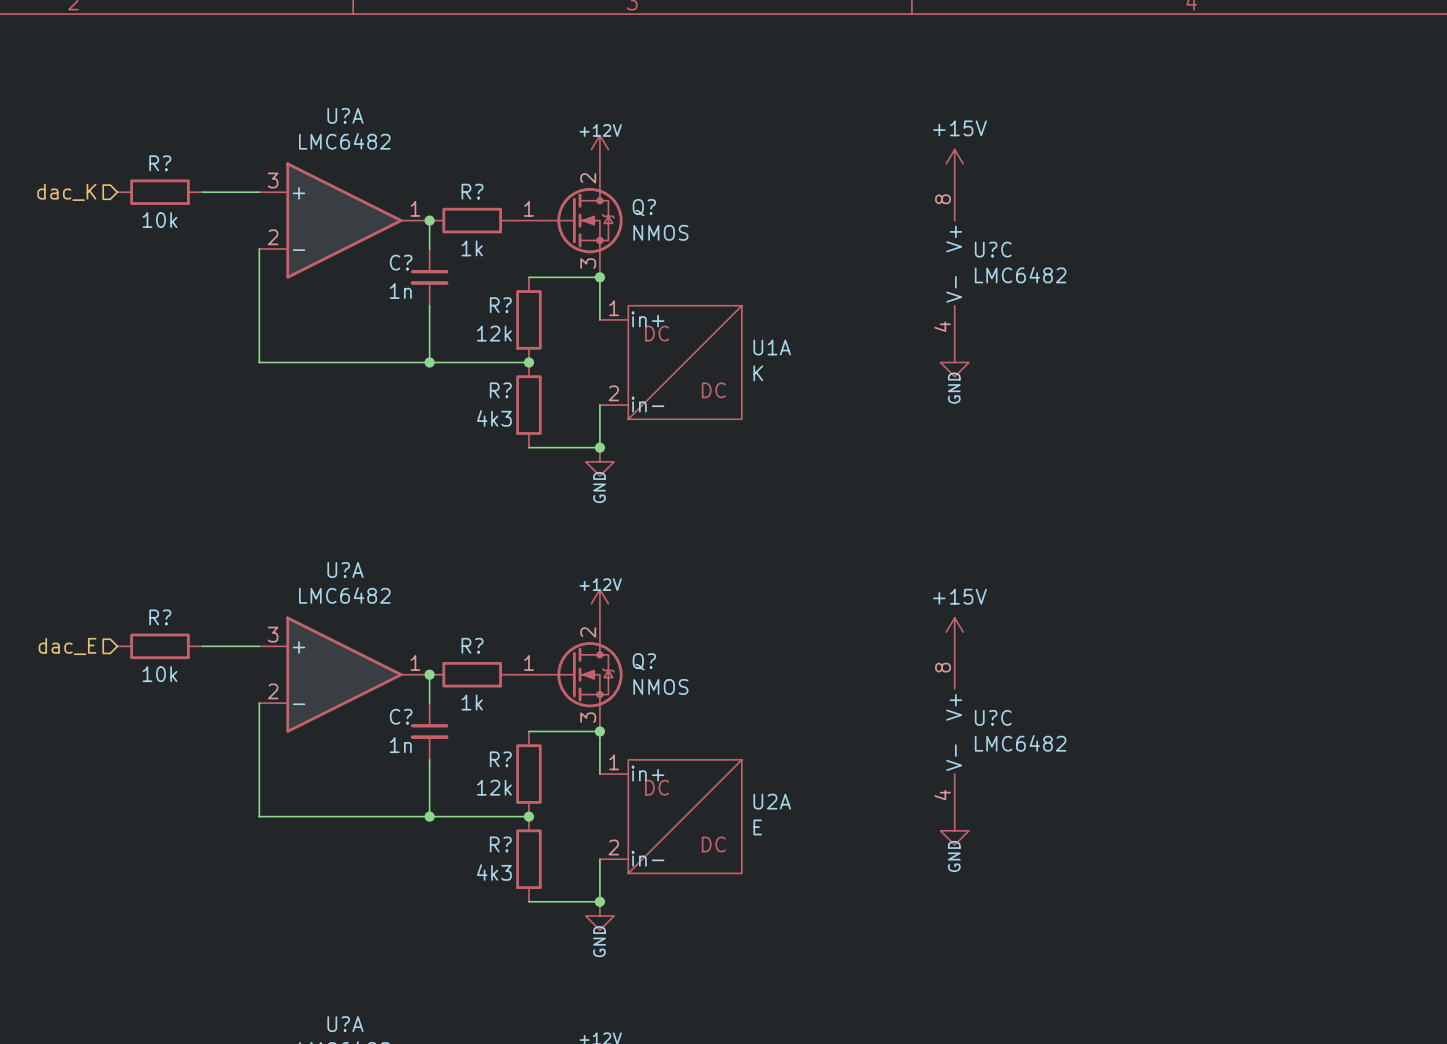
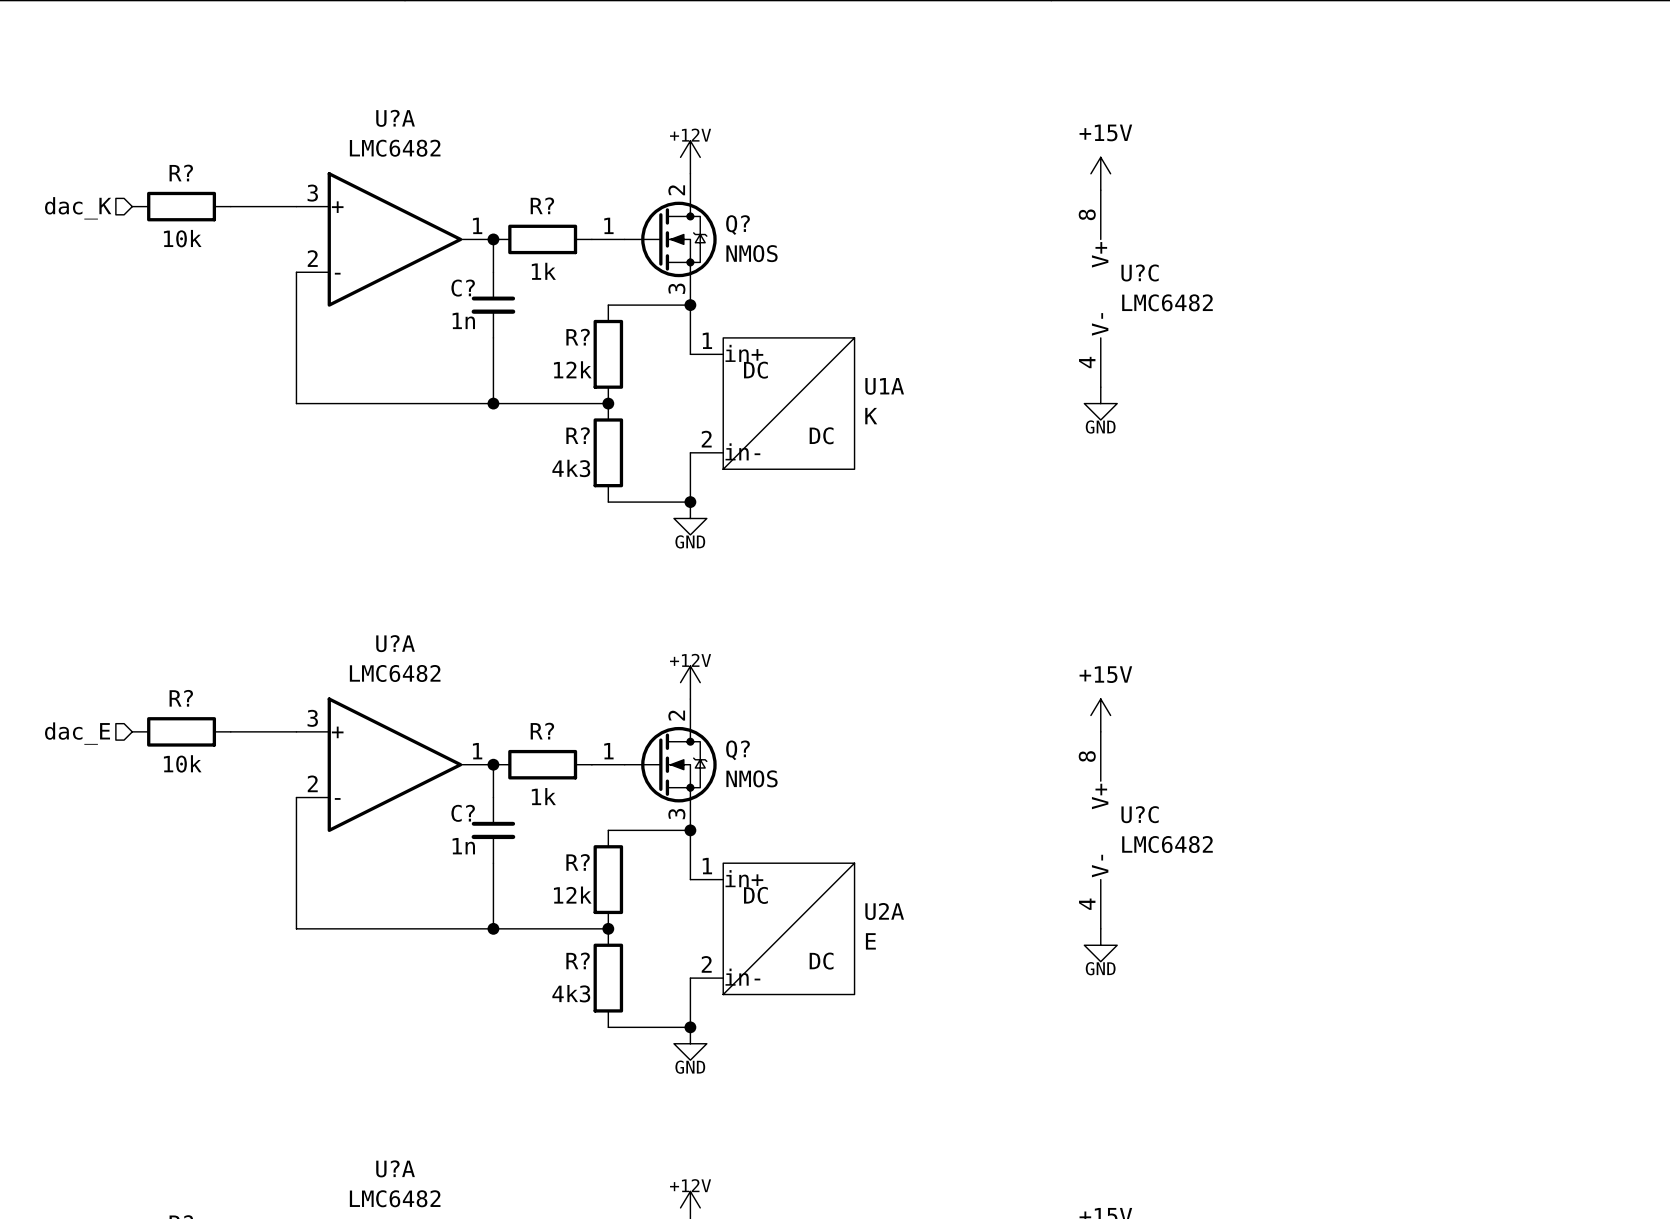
power symbol text rotation: 0° (954, 388) -> 90° clockwise (1100, 427)
power symbol text rotation: 0° (599, 487) -> 90° clockwise (690, 541)
power symbol text rotation: 0° (954, 856) -> 90° clockwise (1100, 968)
power symbol text rotation: 0° (599, 941) -> 90° clockwise (690, 1067)

